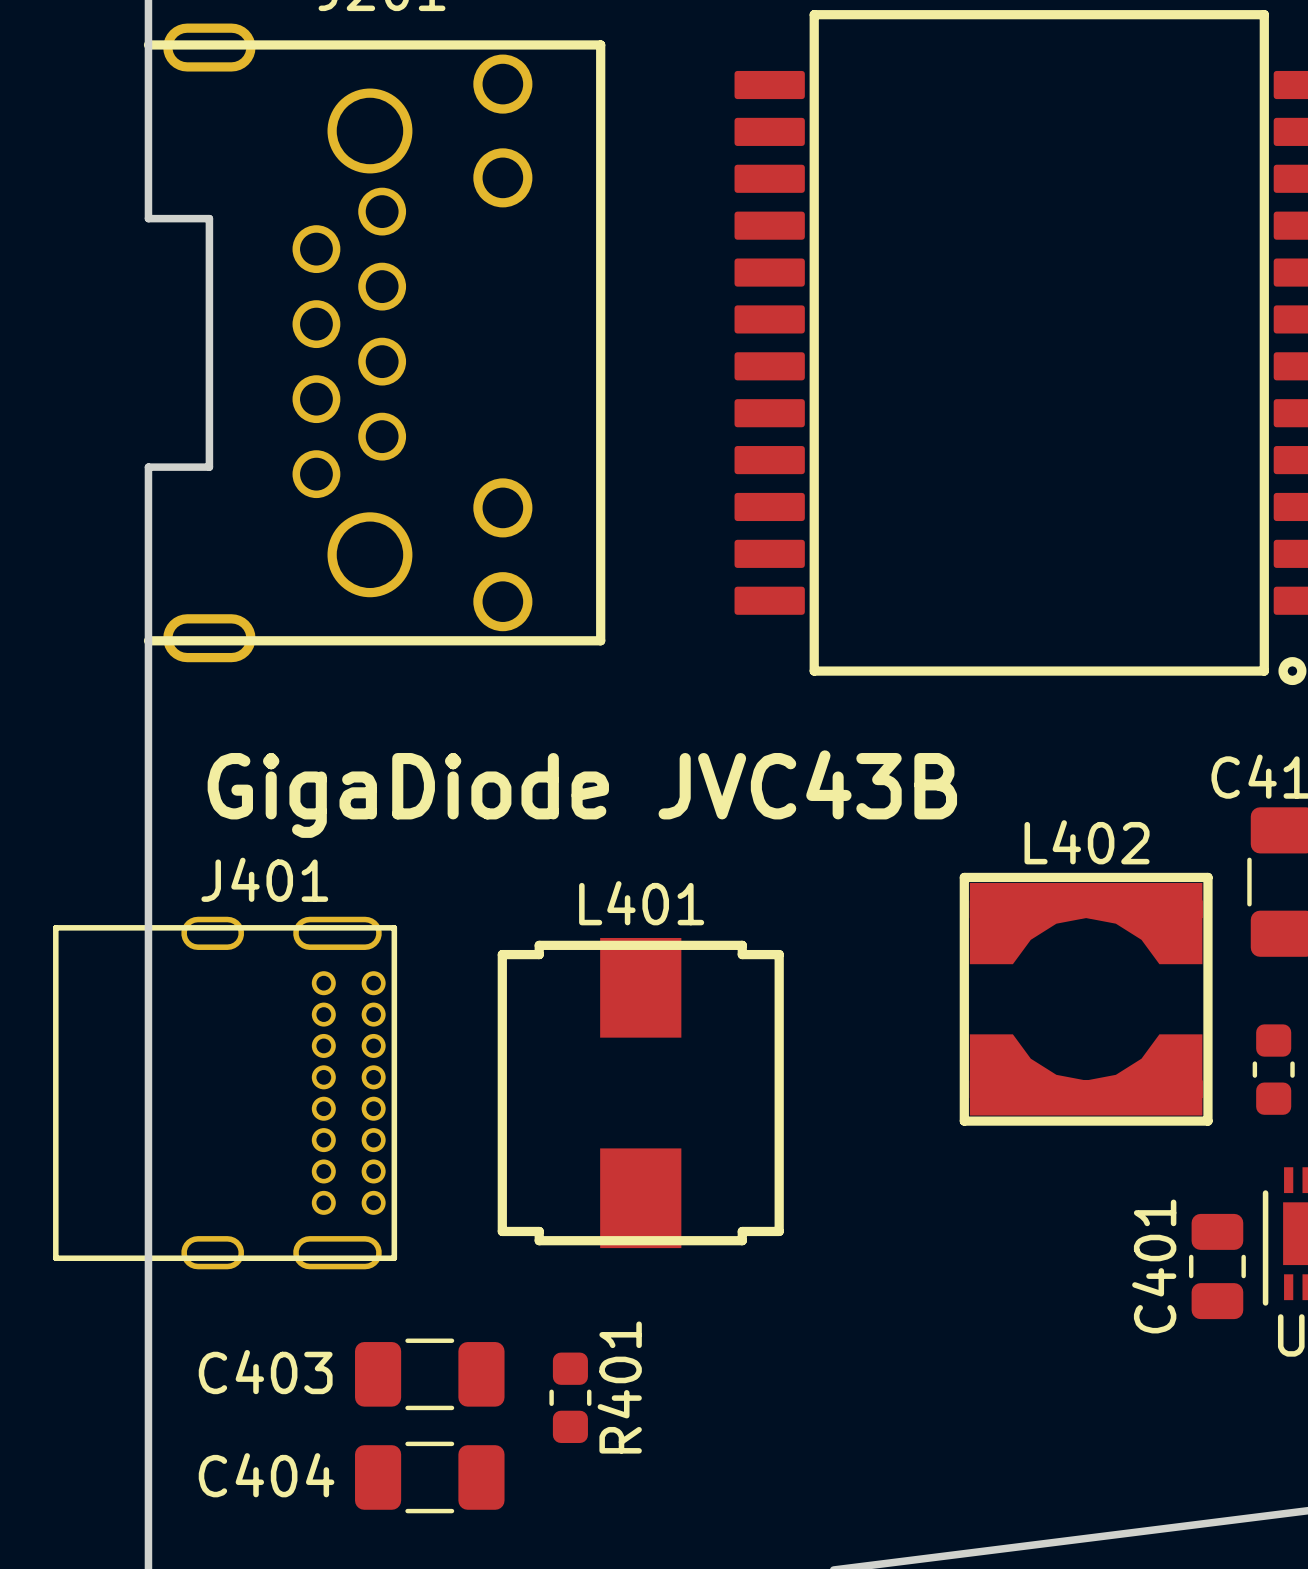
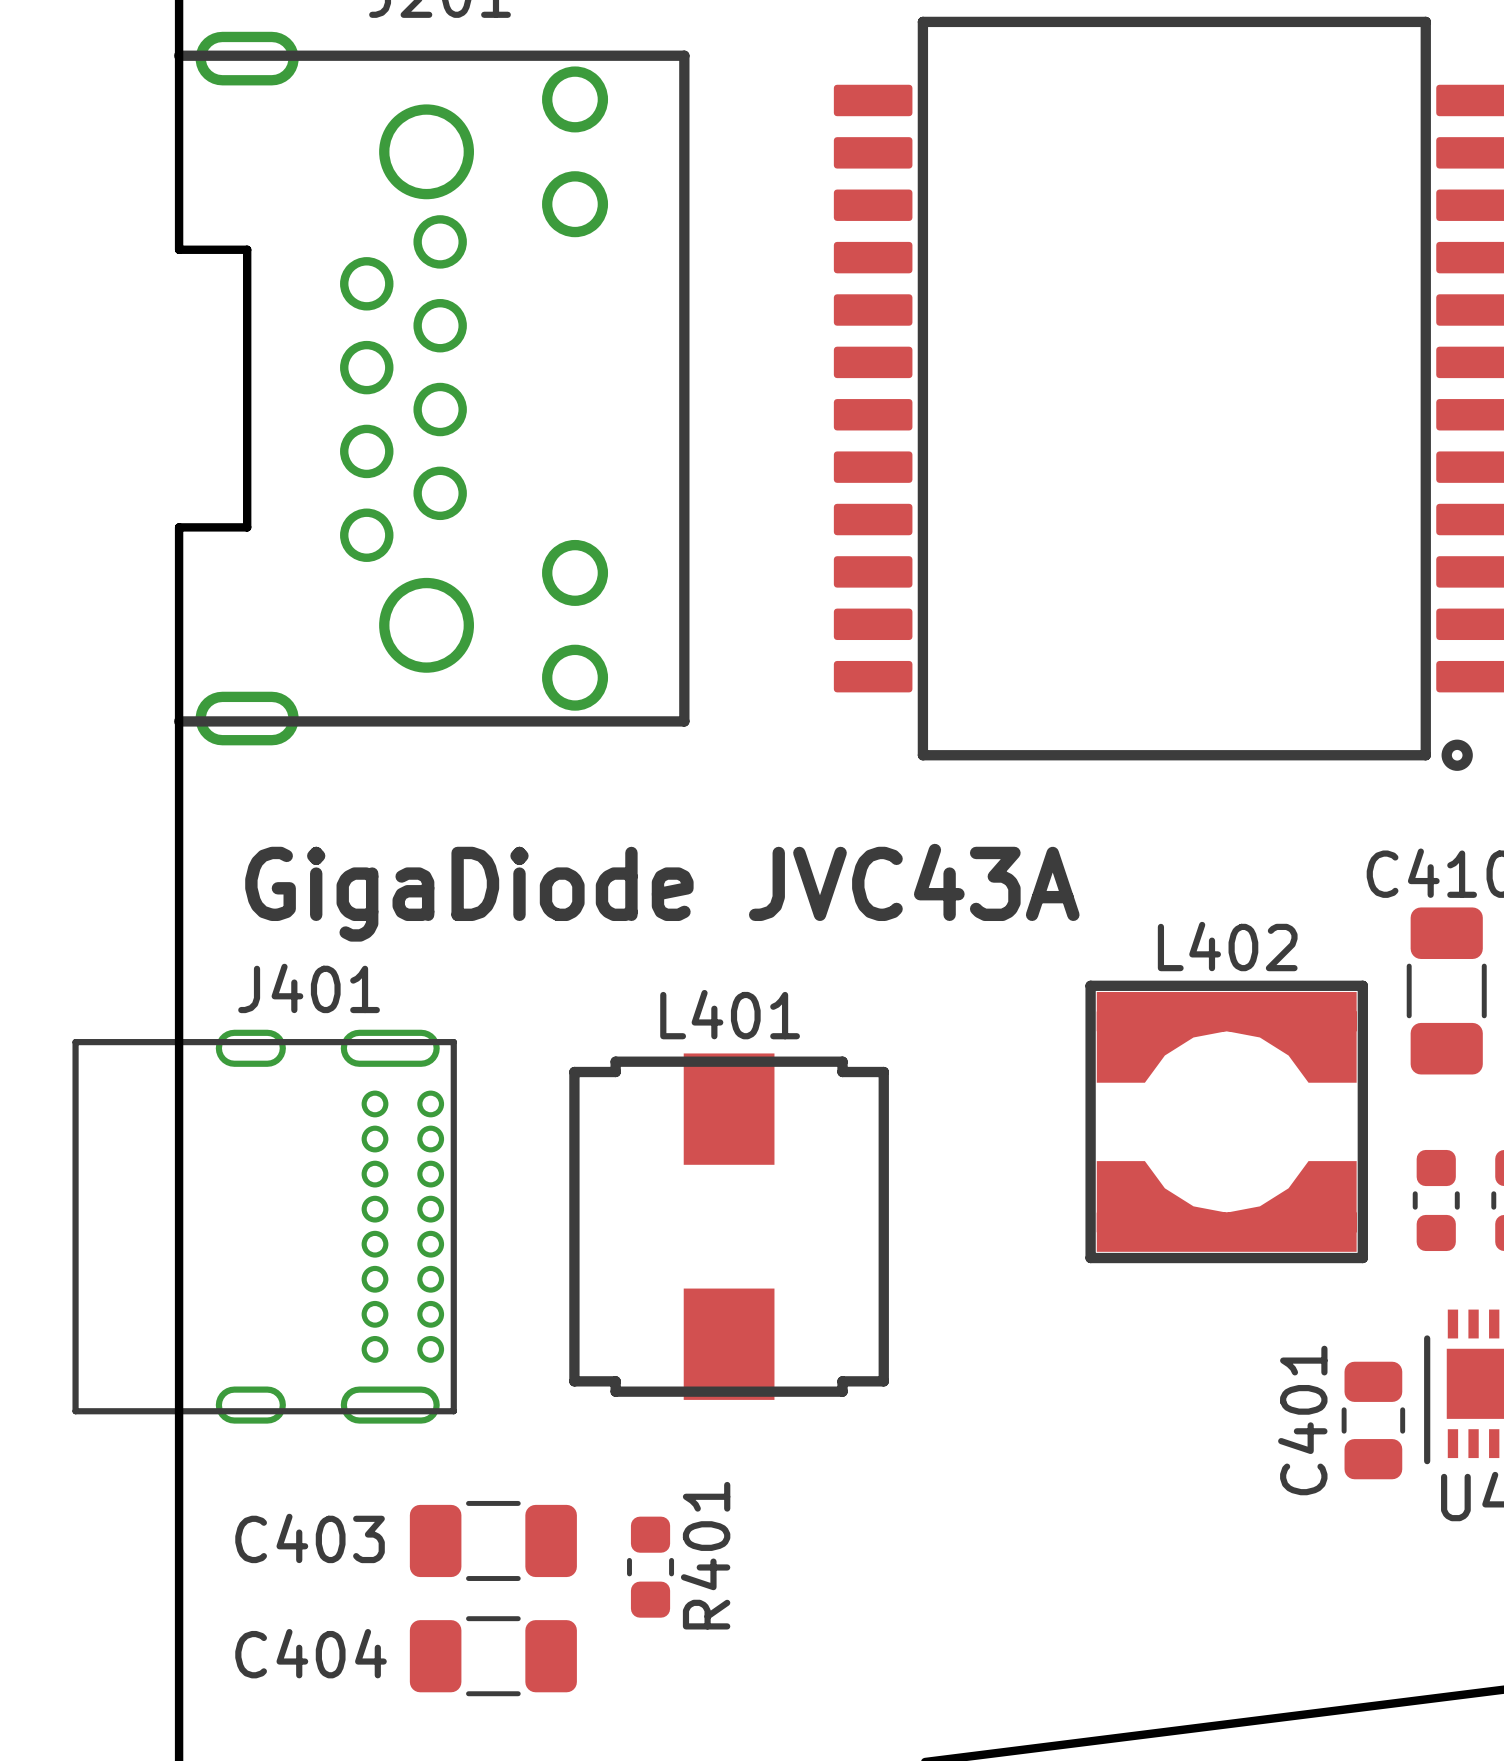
text: GigaDiode JVC43B (582, 794) -> GigaDiode JVC43A (662, 892)

